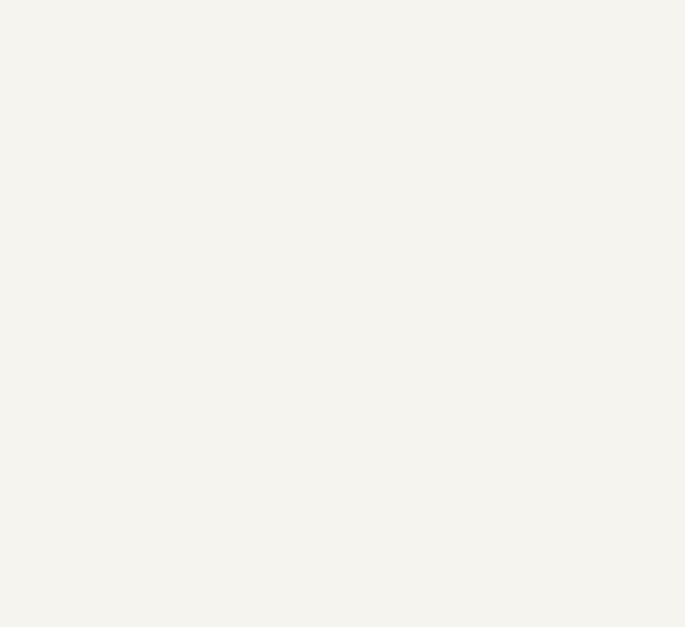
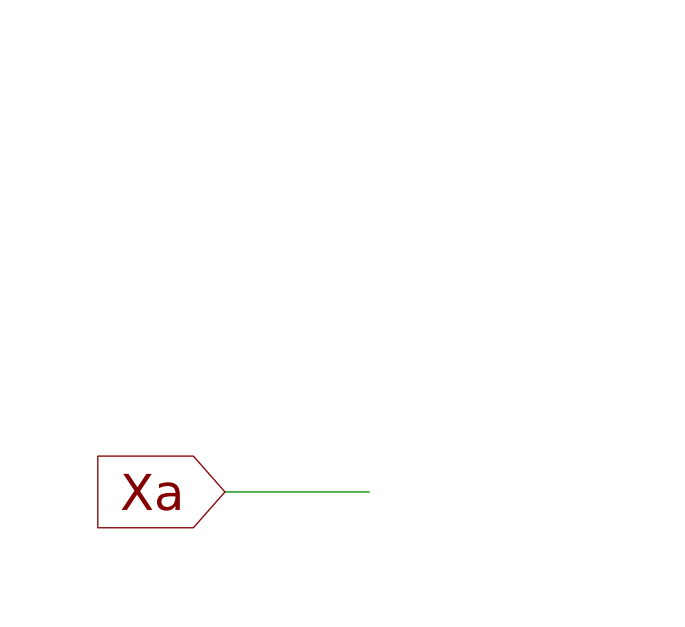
wire: none -> (224, 491) (369, 491)
global label: none -> Xa (150, 492)

